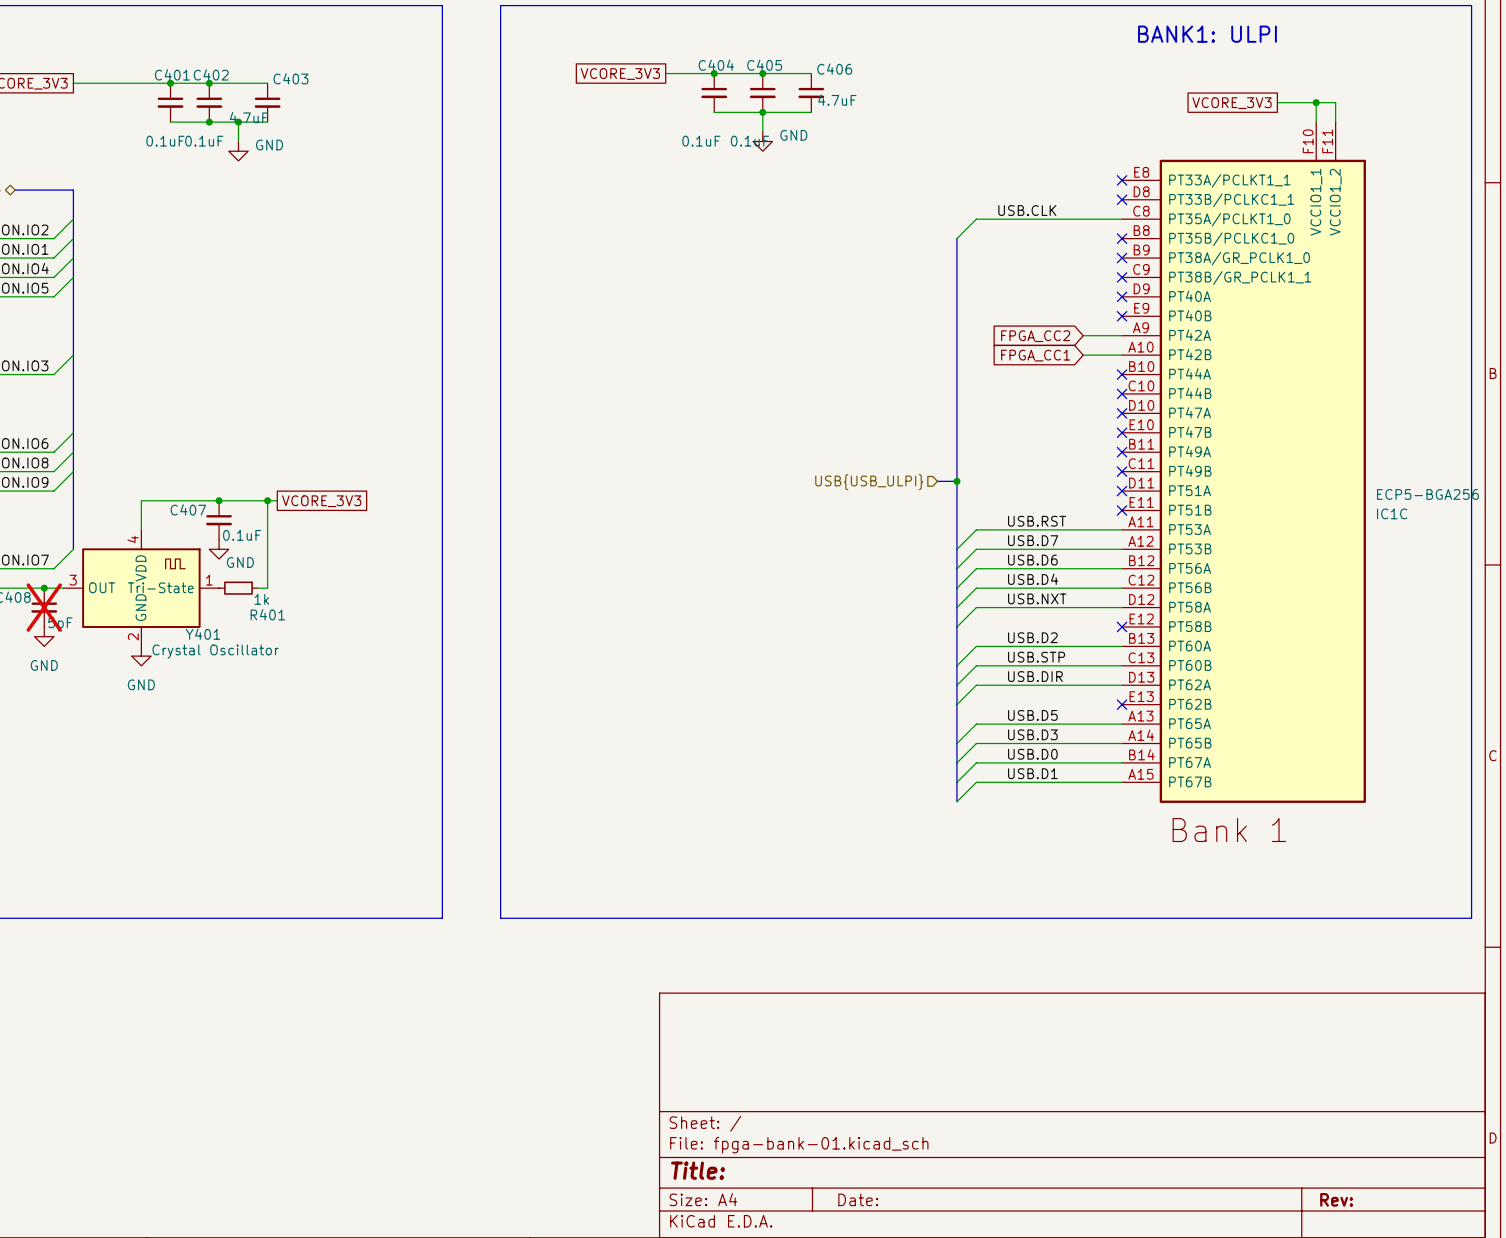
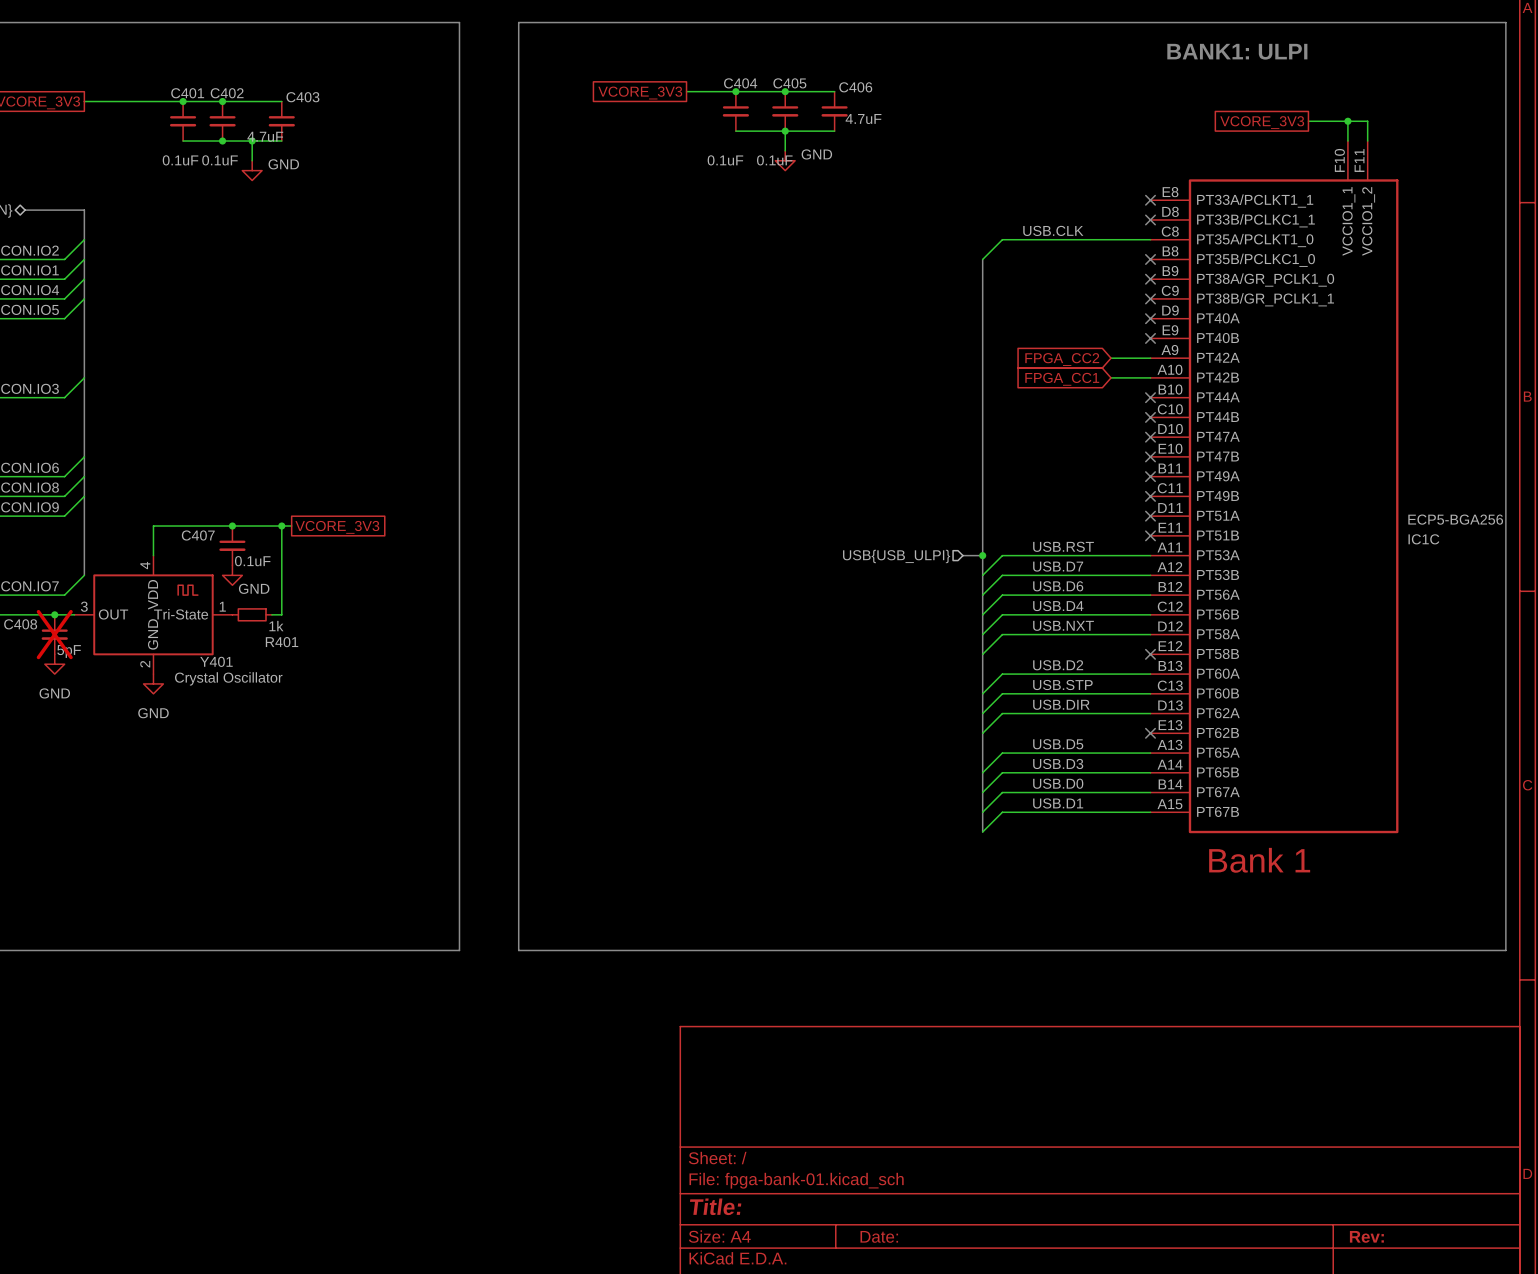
bus: (937, 481) (956, 481) -> (962, 555) (982, 555)
junction: (956, 481) -> none
hierarchical label position: USB{USB_ULPI} (869, 482) -> USB{USB_ULPI} (896, 556)
junction: none -> (982, 555)

